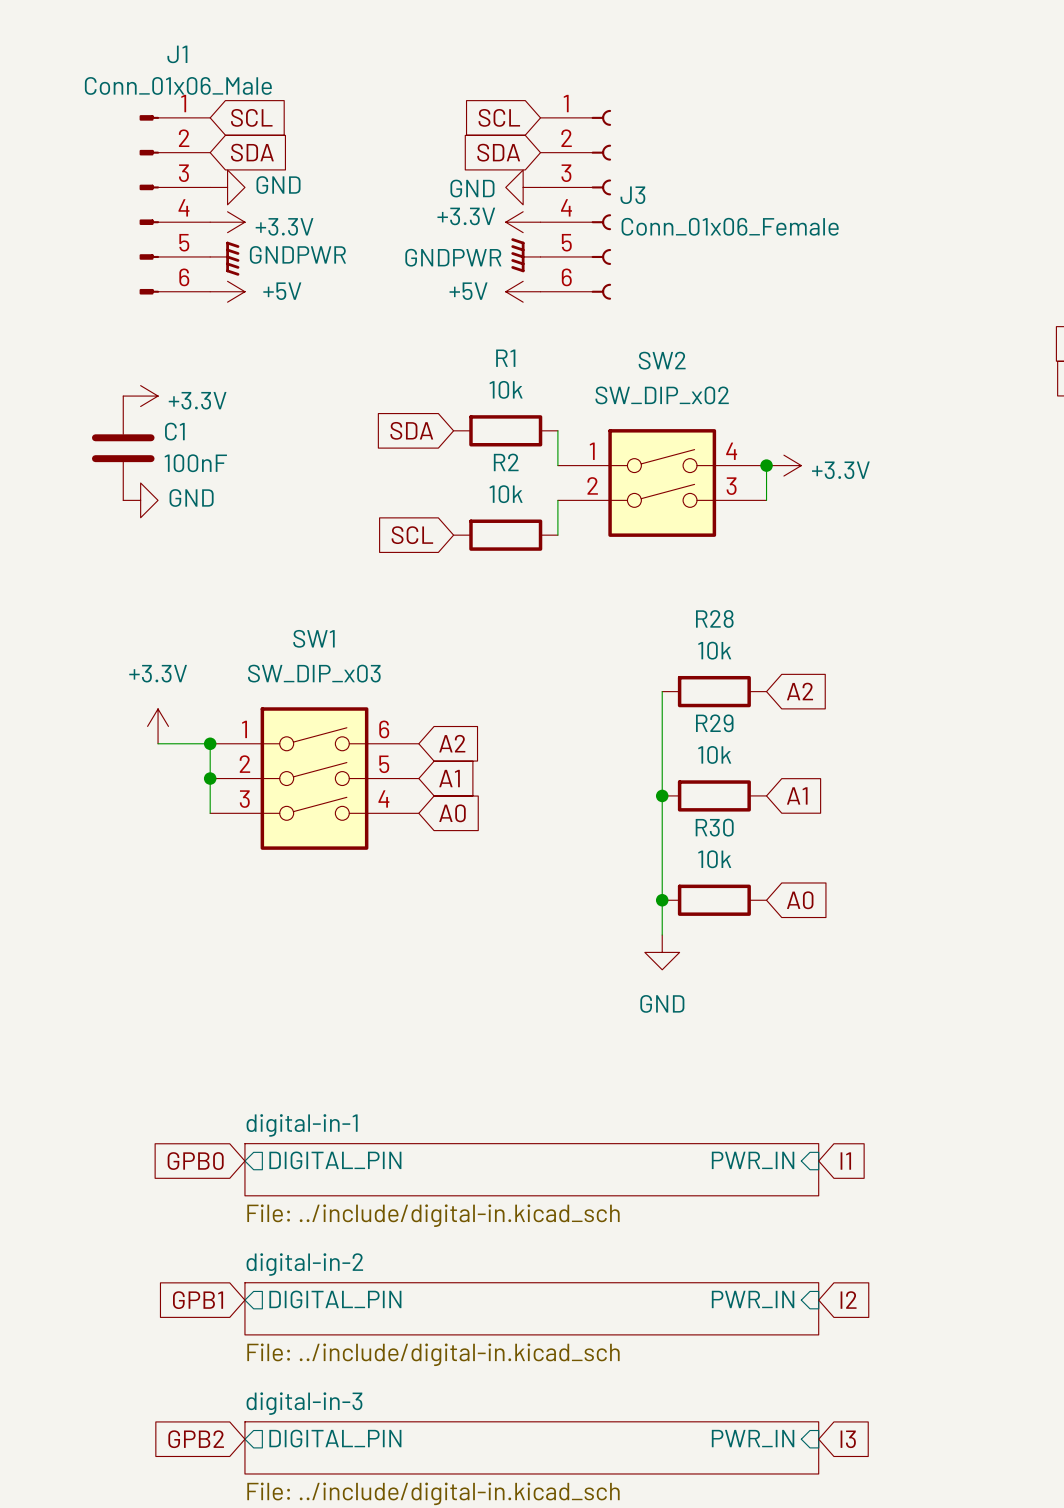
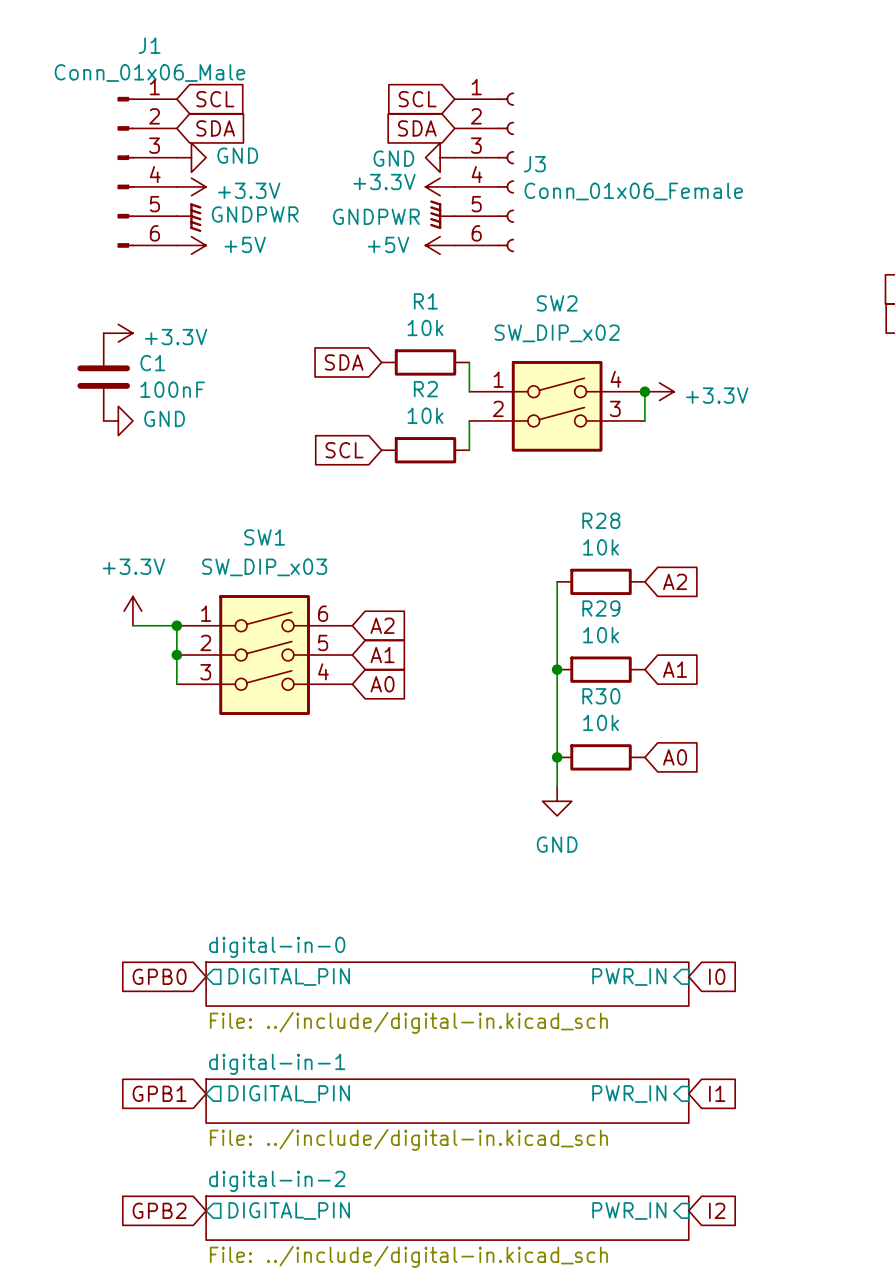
sheet digital-in-1 name: digital-in-1 (302, 1125) -> digital-in-0 (277, 947)
global label: I1 (845, 1161) -> I0 (717, 976)
sheet digital-in-2 name: digital-in-2 (304, 1264) -> digital-in-1 (277, 1064)
global label: I2 (848, 1300) -> I1 (717, 1093)
sheet digital-in-3 name: digital-in-3 (304, 1403) -> digital-in-2 (277, 1181)
global label: I3 (848, 1439) -> I2 (717, 1210)

